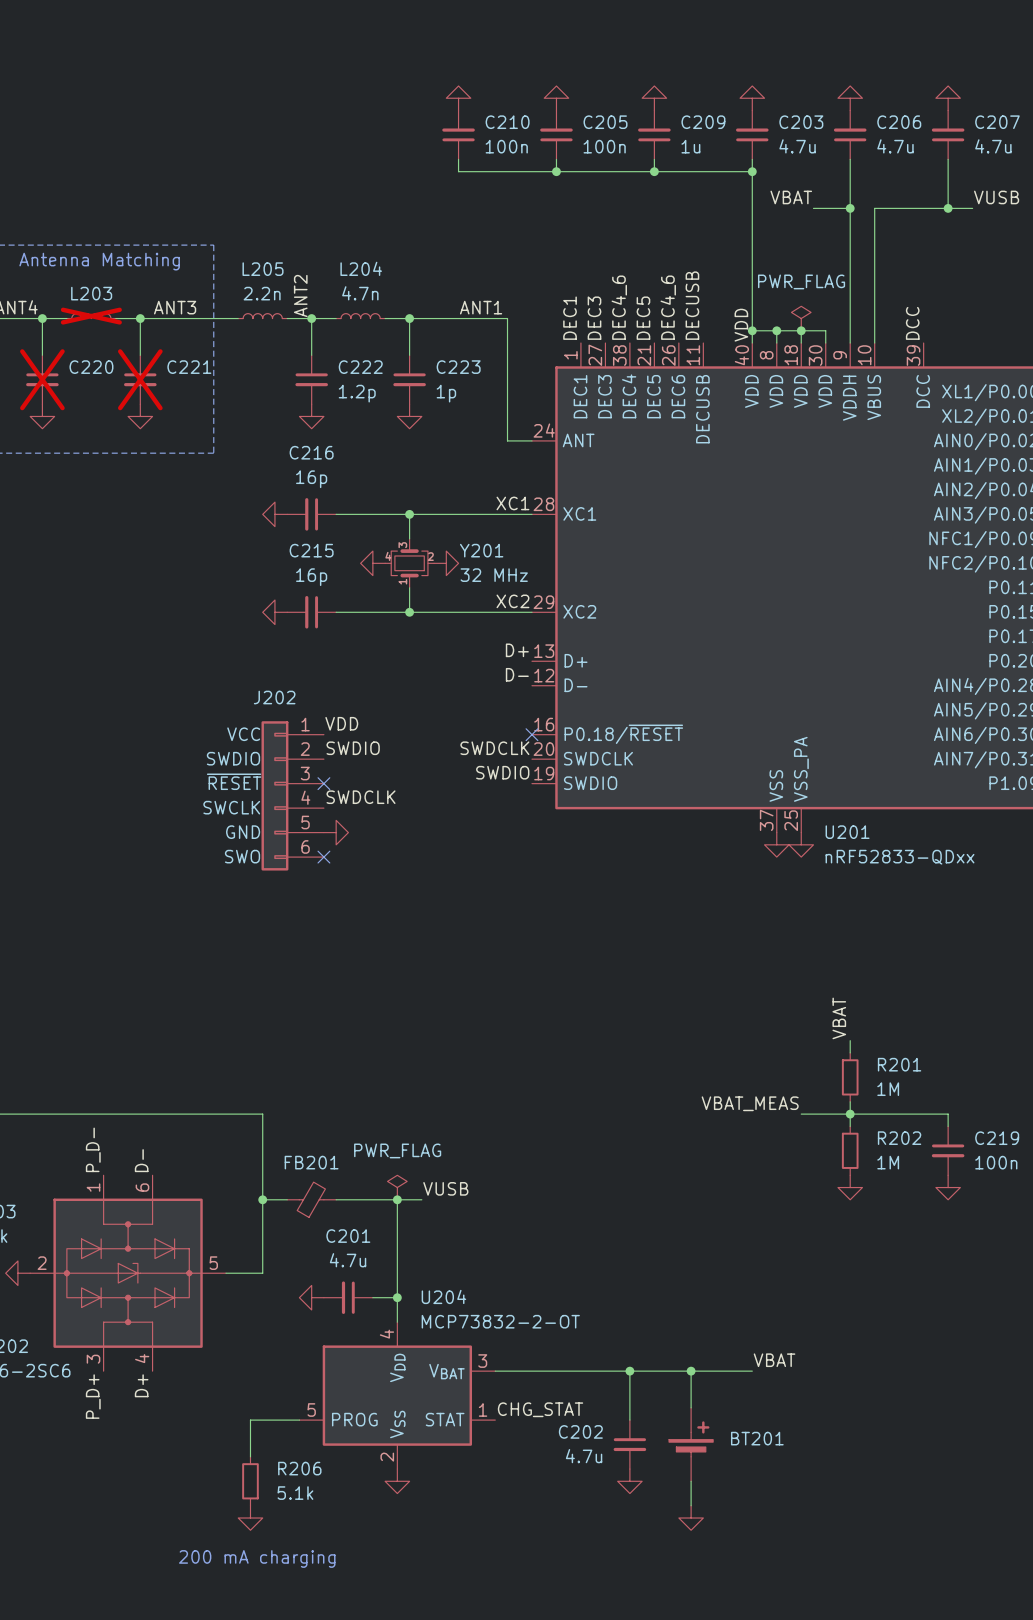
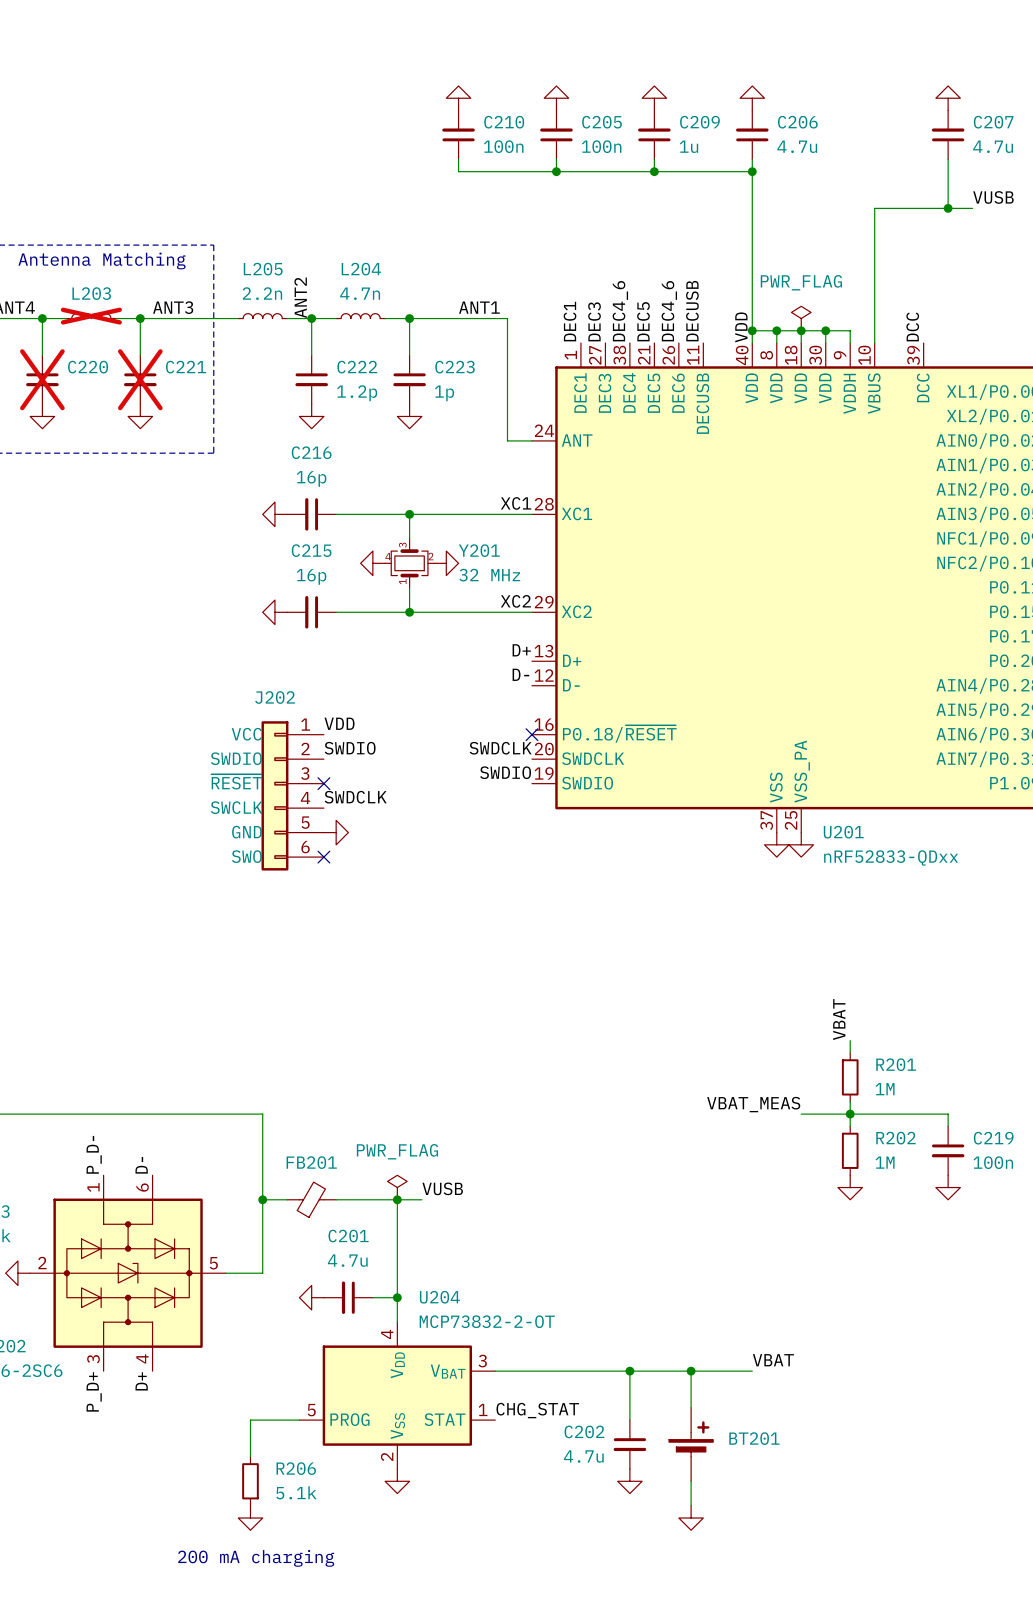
power symbol: (850, 98) -> none
C203 name: C203 (801, 122) -> C206 (797, 122)
C206: 4.7u (850, 134) -> none
wire: (850, 159) (850, 330) -> (825, 330) (850, 330)
label: VBAT (791, 197) -> none
wire: (813, 208) (850, 208) -> none
junction: (850, 208) -> none
junction: none -> (825, 330)

